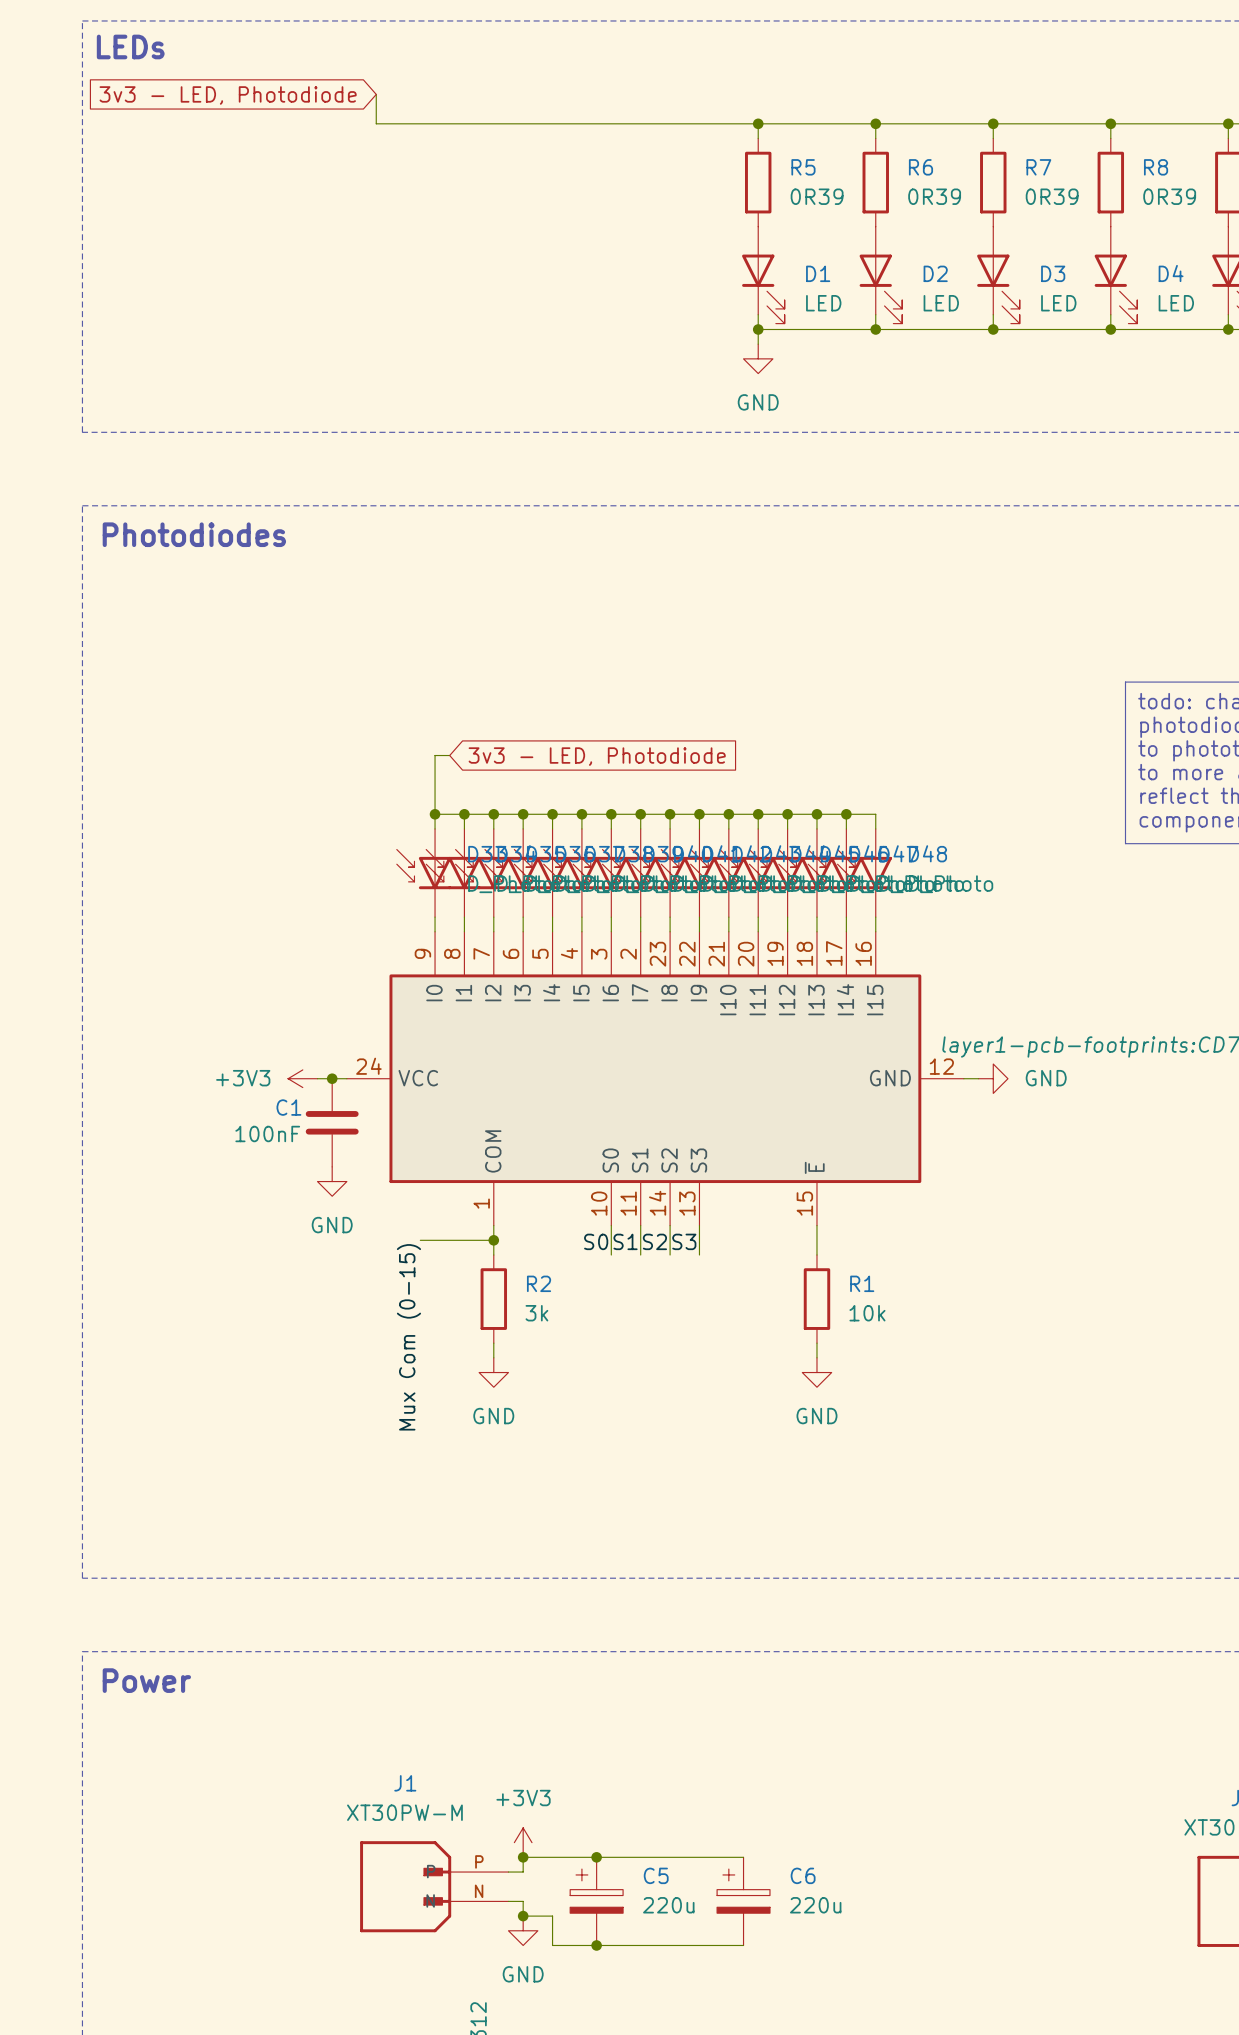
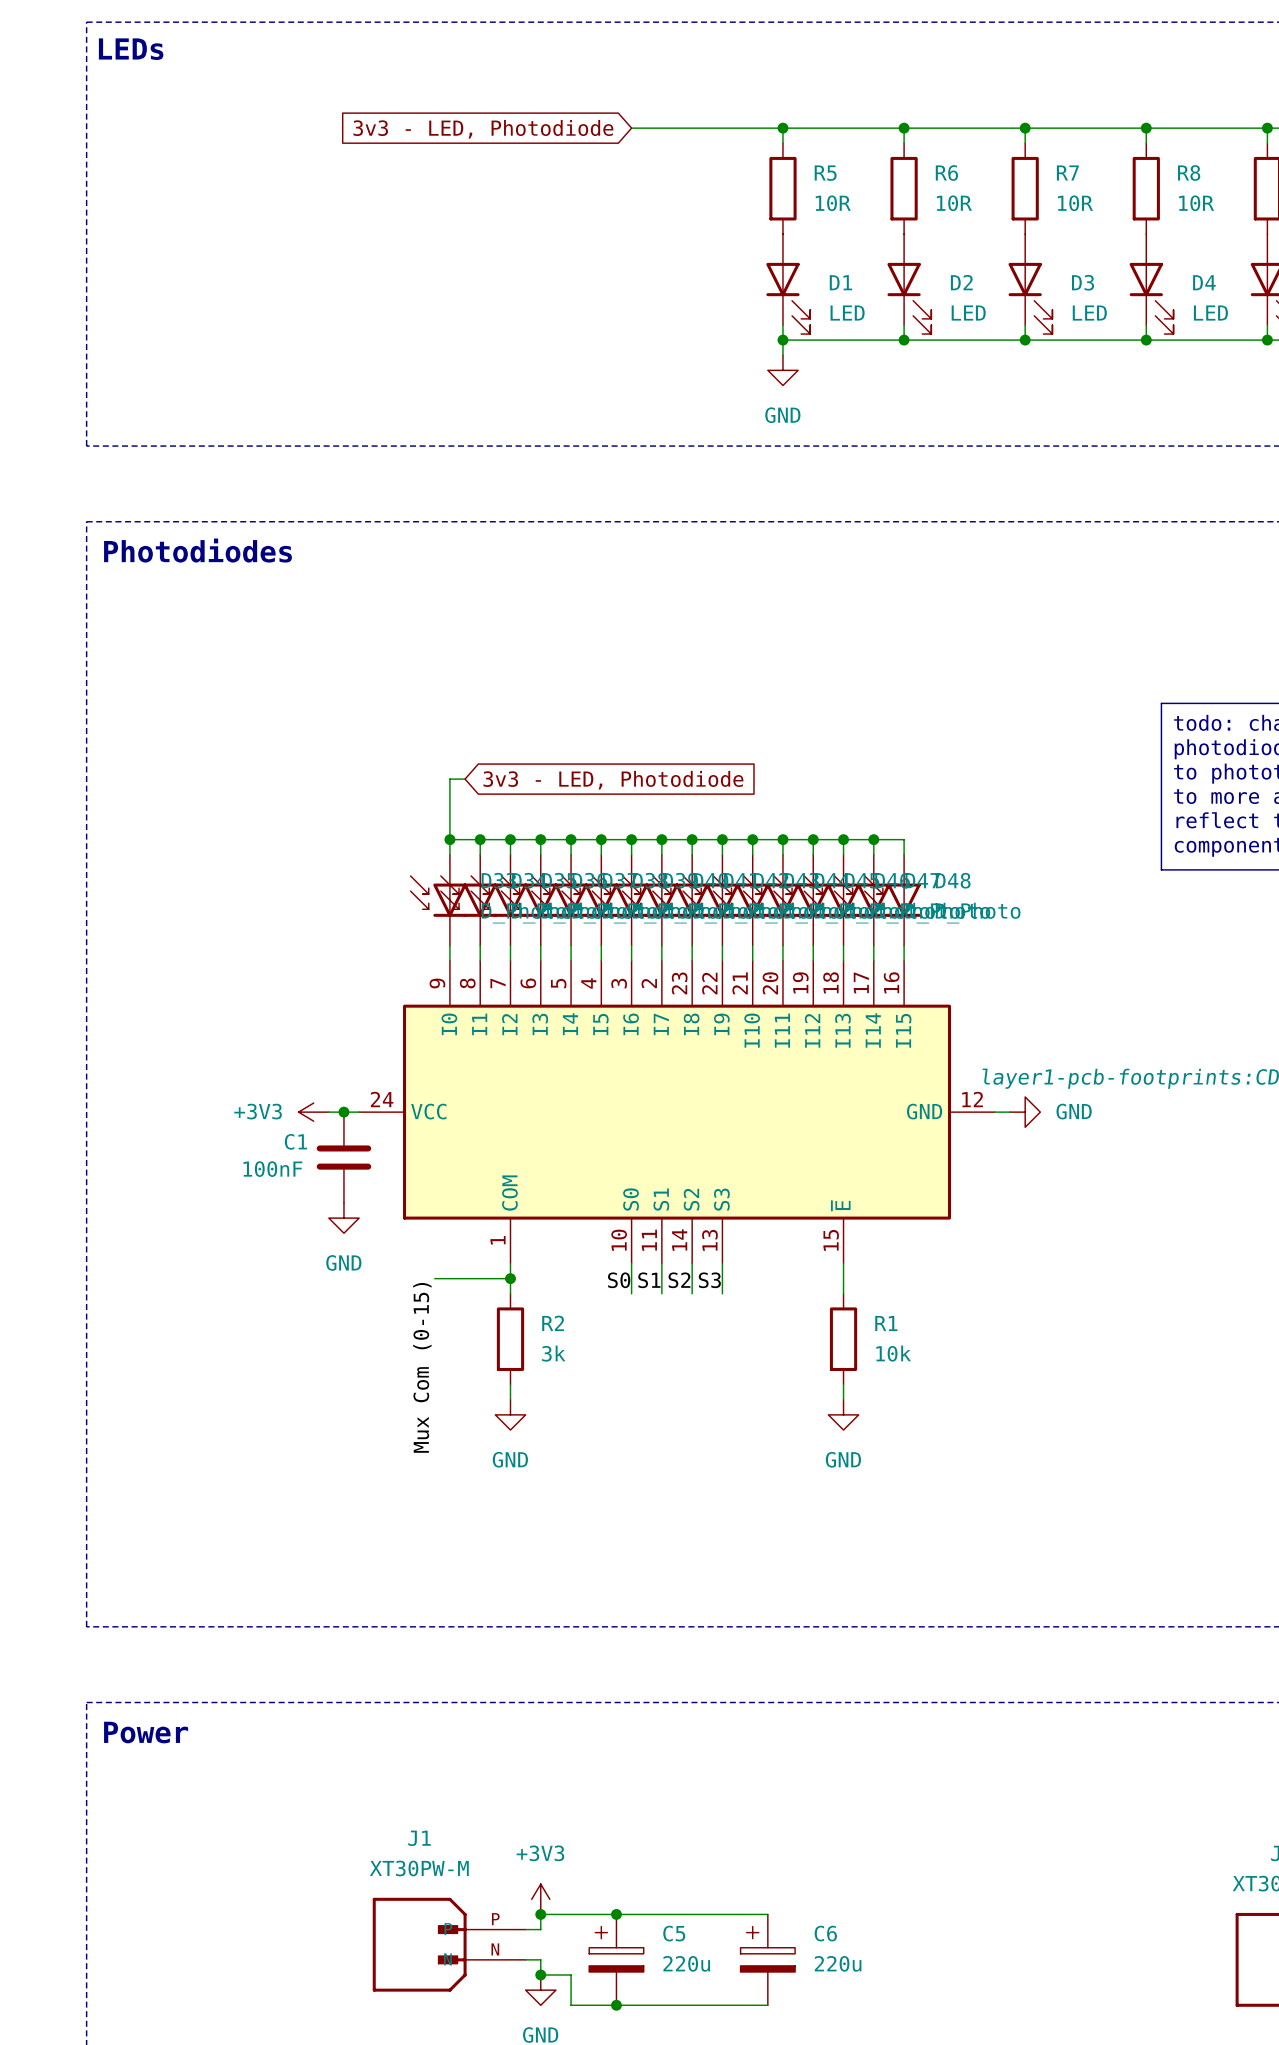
wire: (376, 94) (376, 123) (611, 123) -> none
global label position: 3v3 - LED, Photodiode (228, 95) -> 3v3 - LED, Photodiode (483, 129)
R5 value: 0R39 (817, 196) -> 10R (833, 203)
R6 value: 0R39 (934, 196) -> 10R (954, 203)
R7 value: 0R39 (1052, 196) -> 10R (1075, 203)
R8 value: 0R39 (1169, 196) -> 10R (1196, 203)

